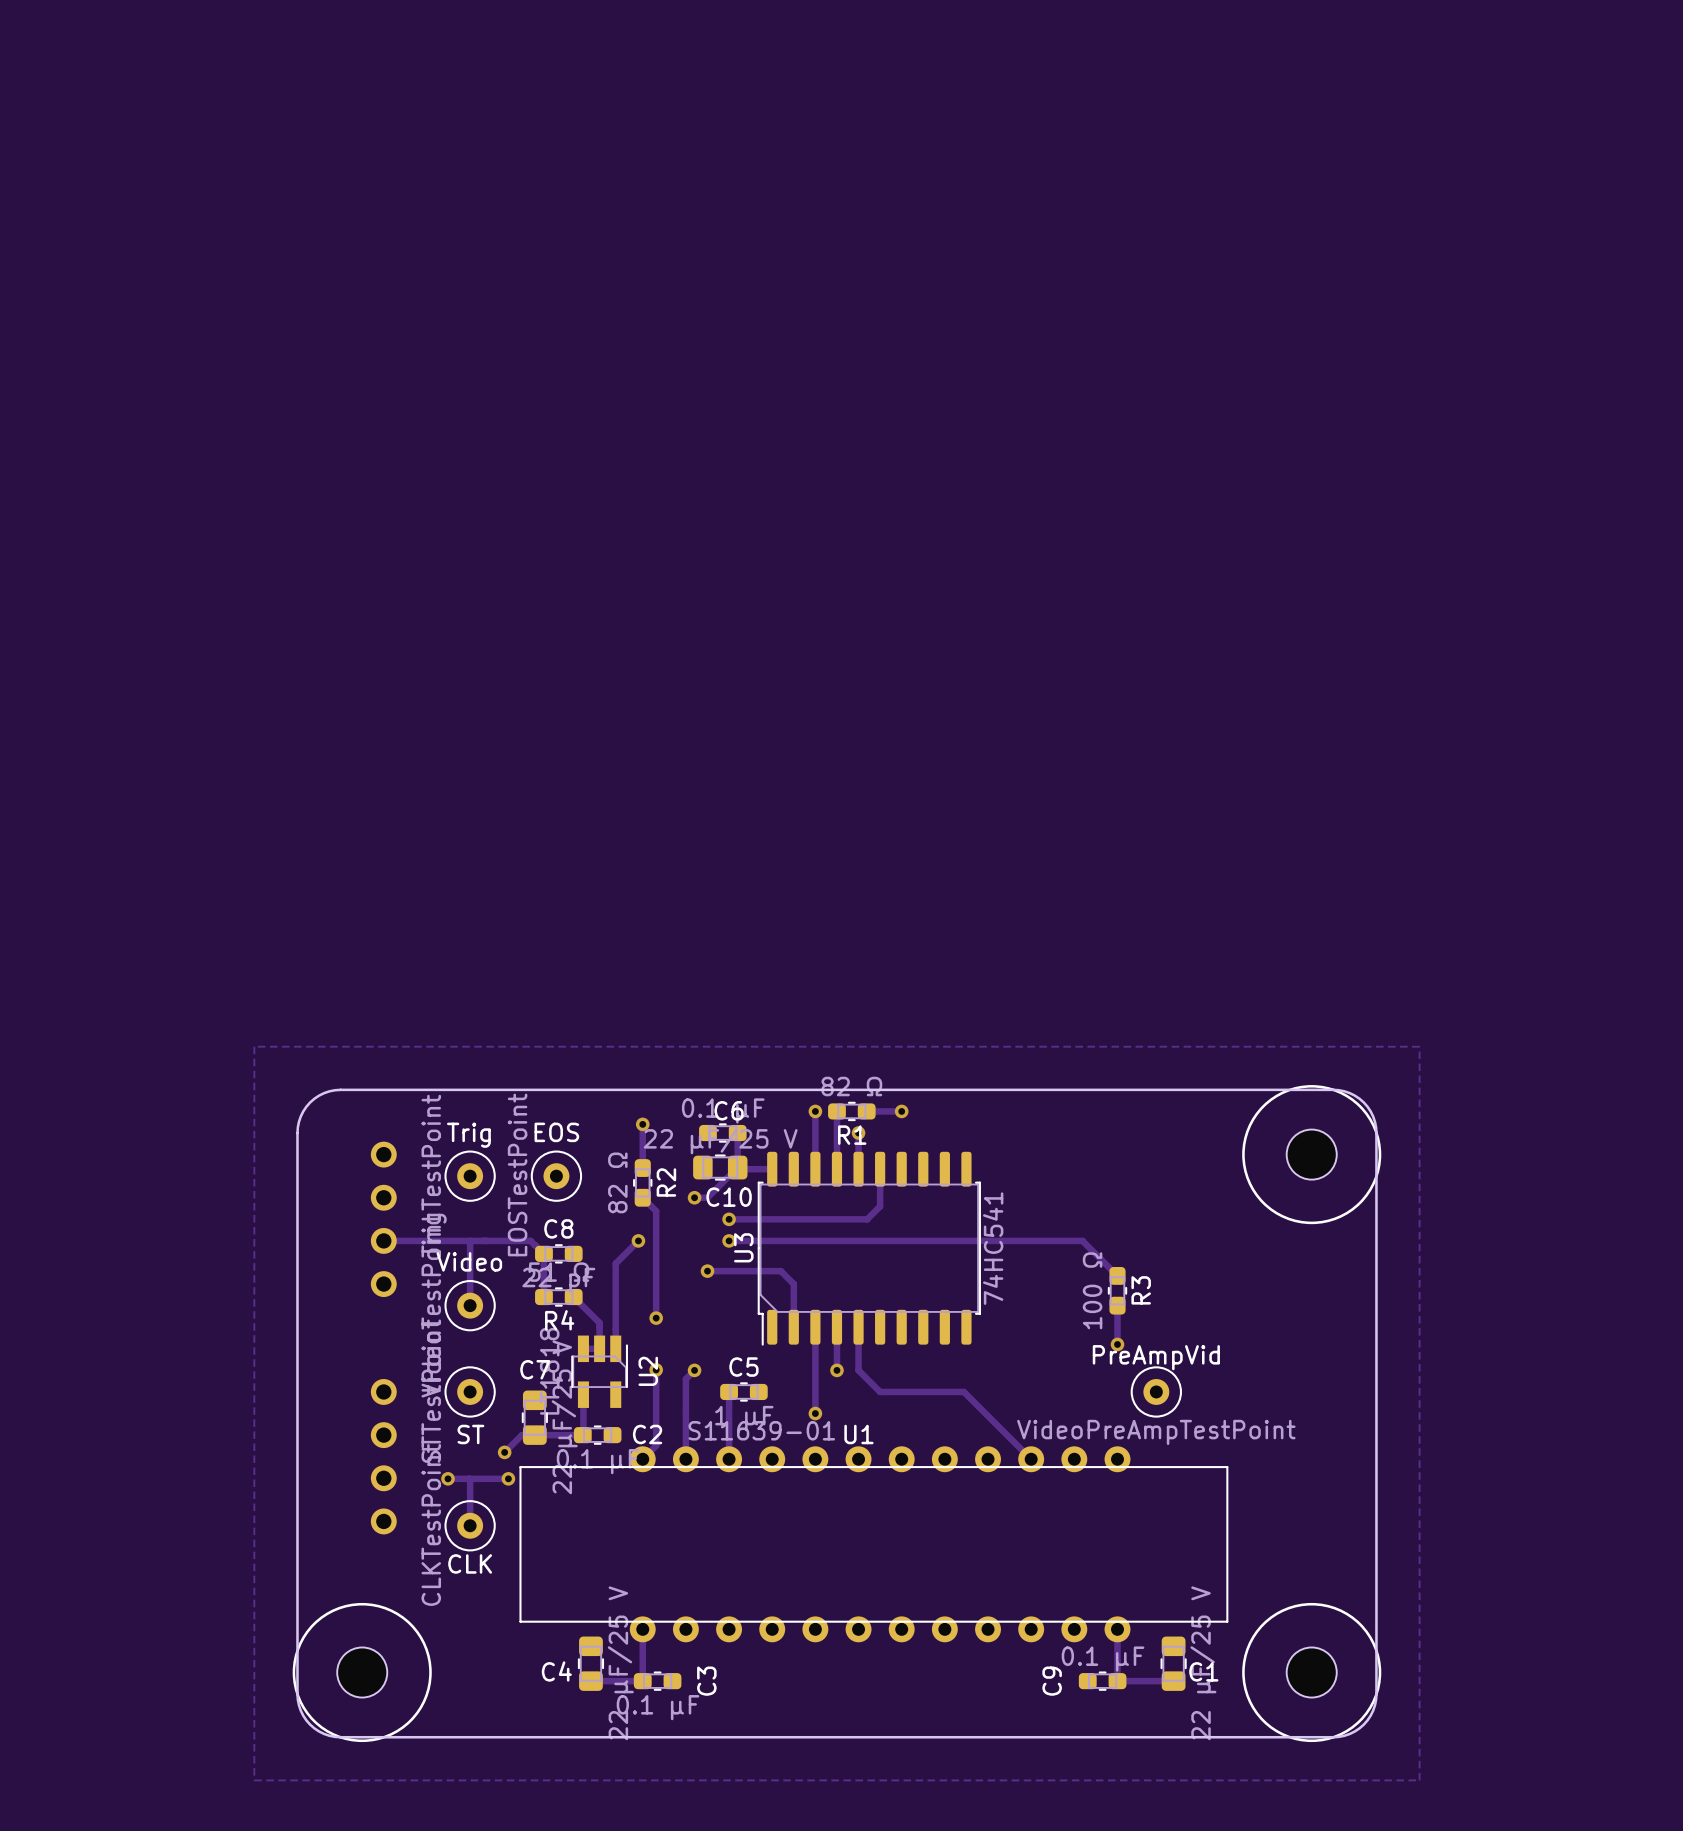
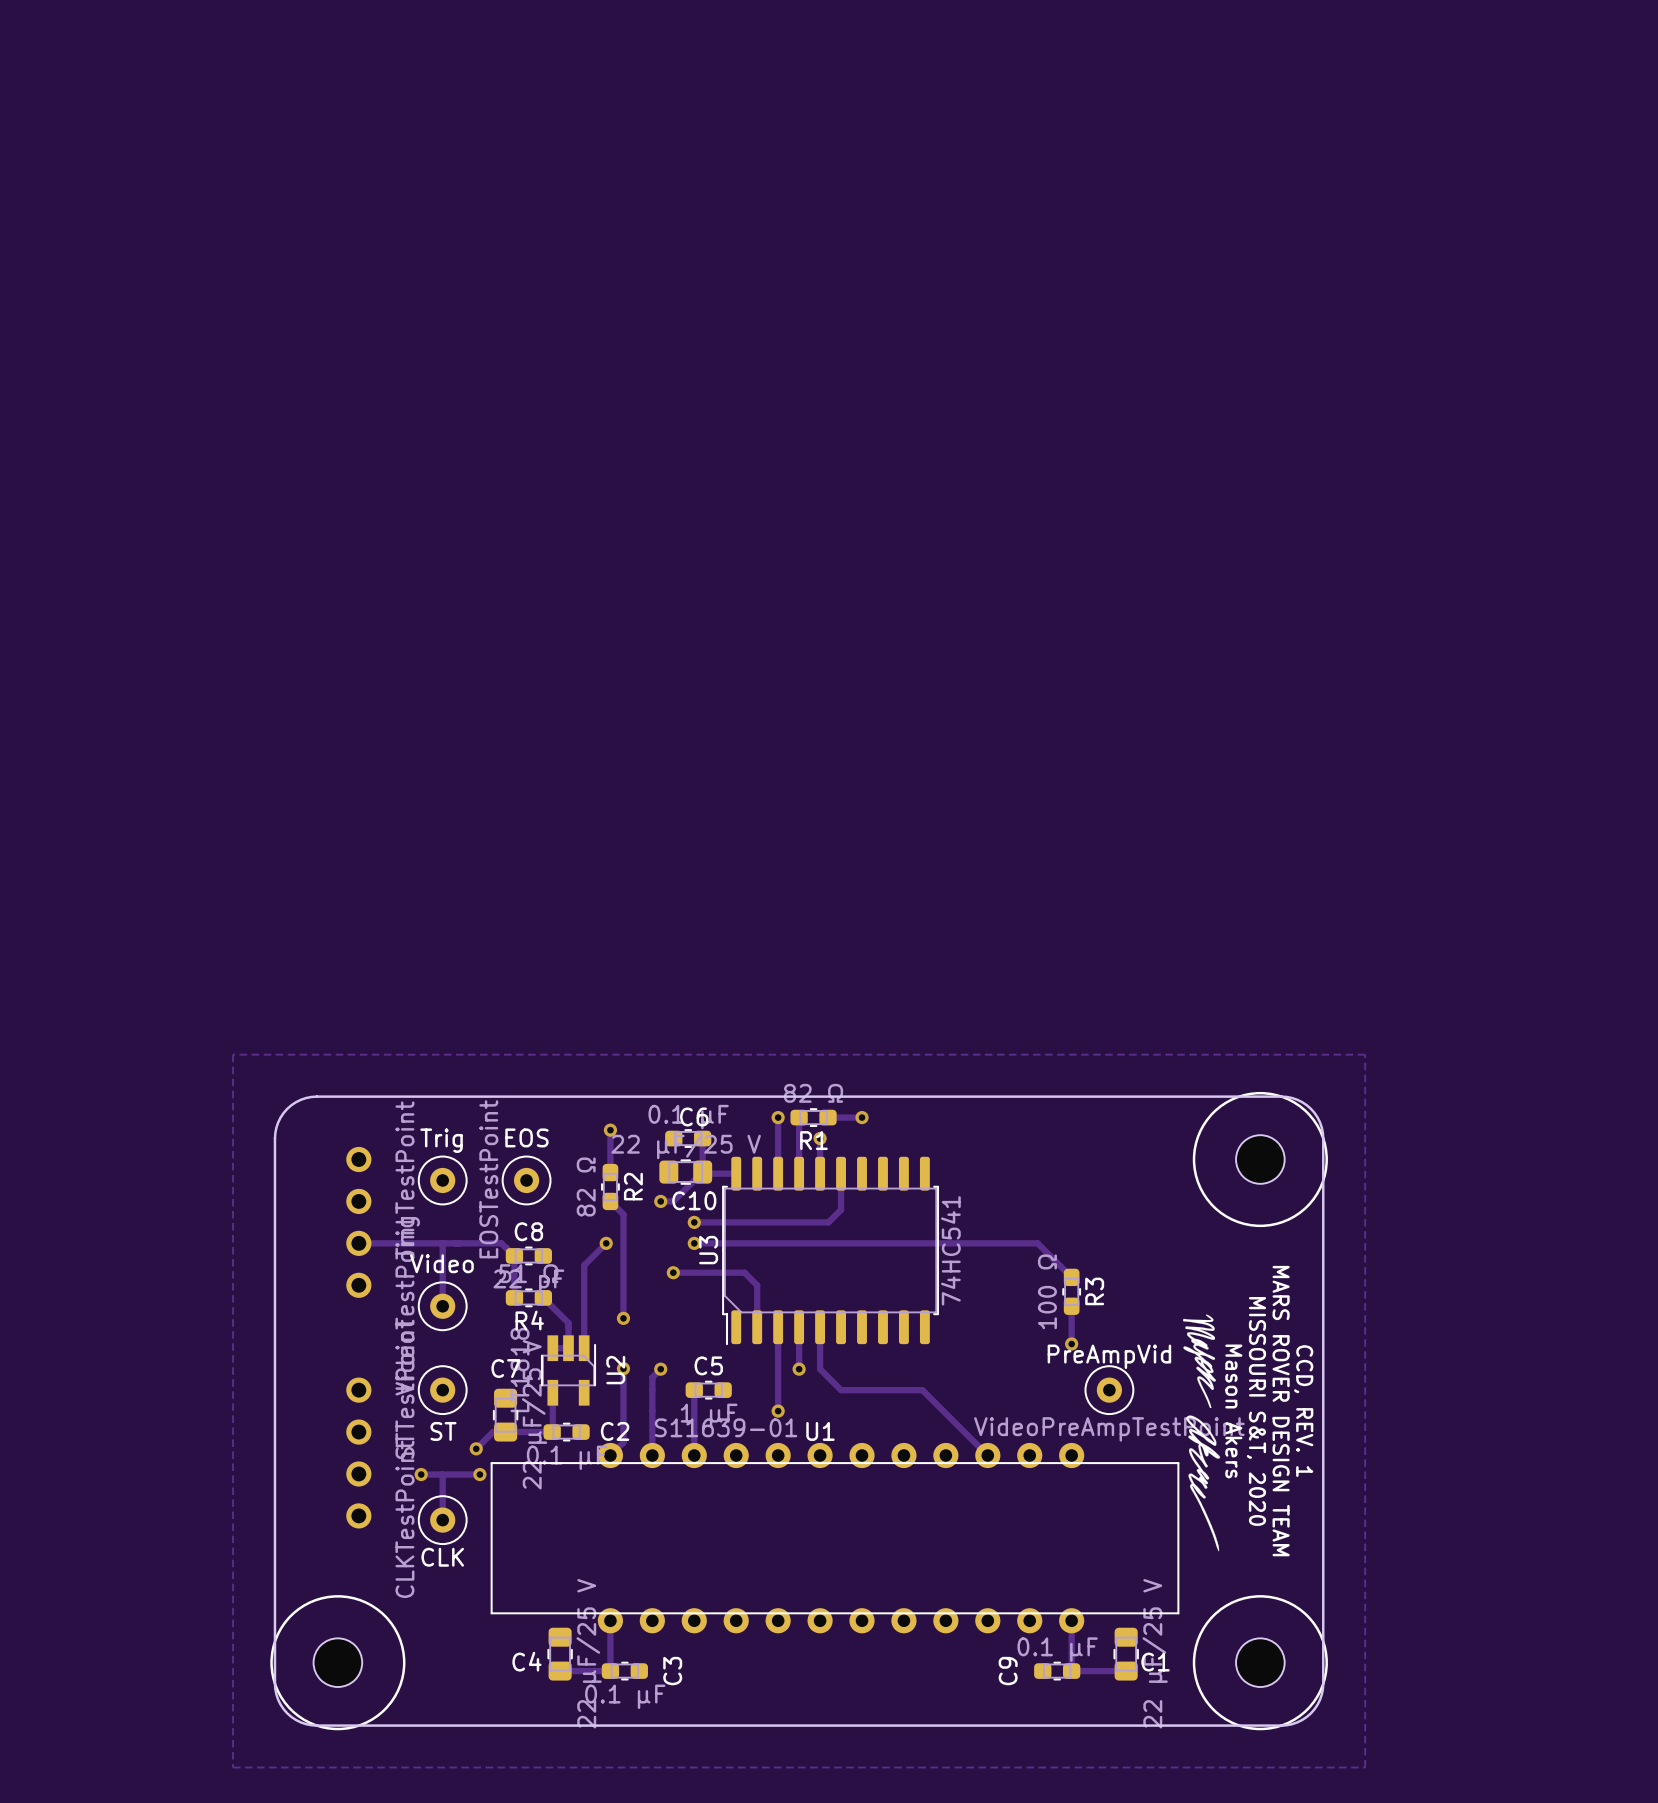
drawing: none -> [1183, 1314, 1221, 1552]
text: none -> Mason Akers (1233, 1411)
text: none -> MISSOURI S&T, 2020 (1256, 1411)
text: none -> MARS ROVER DESIGN TEAM (1281, 1411)
text: none -> CCD, REV. 1 (1303, 1411)

